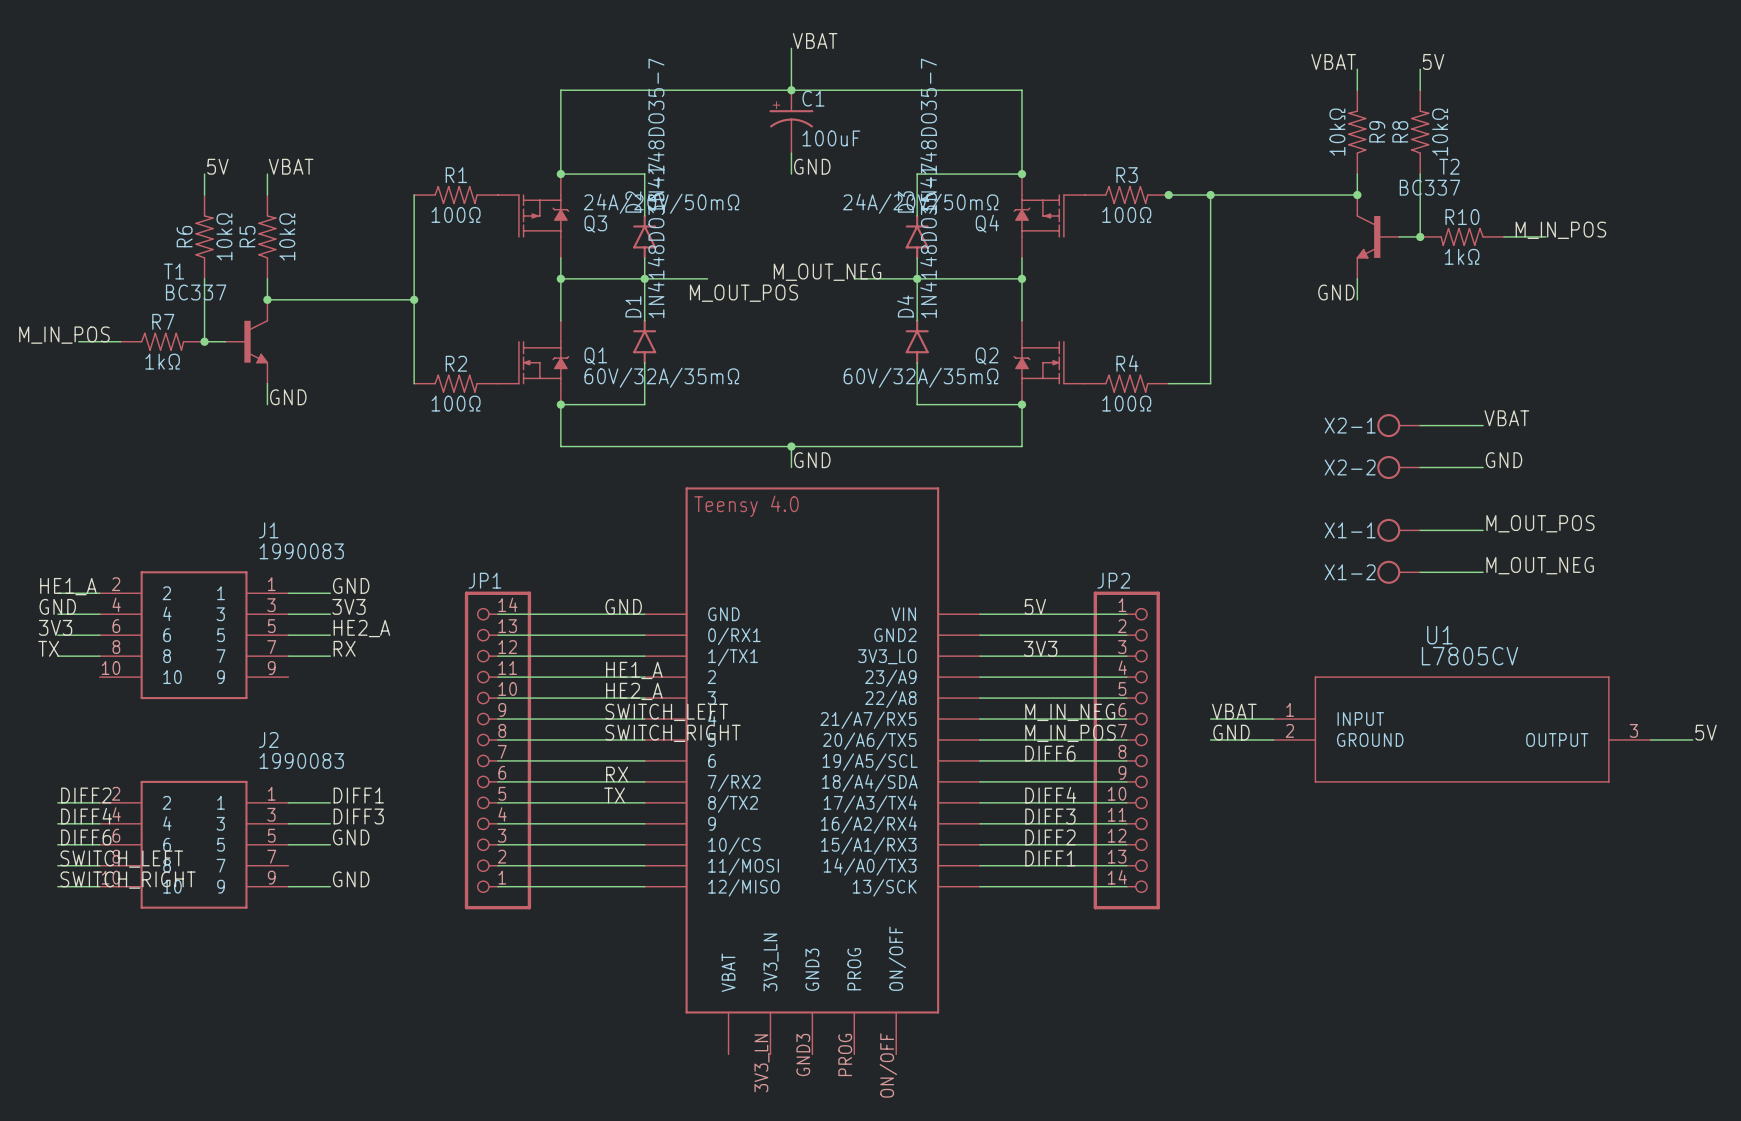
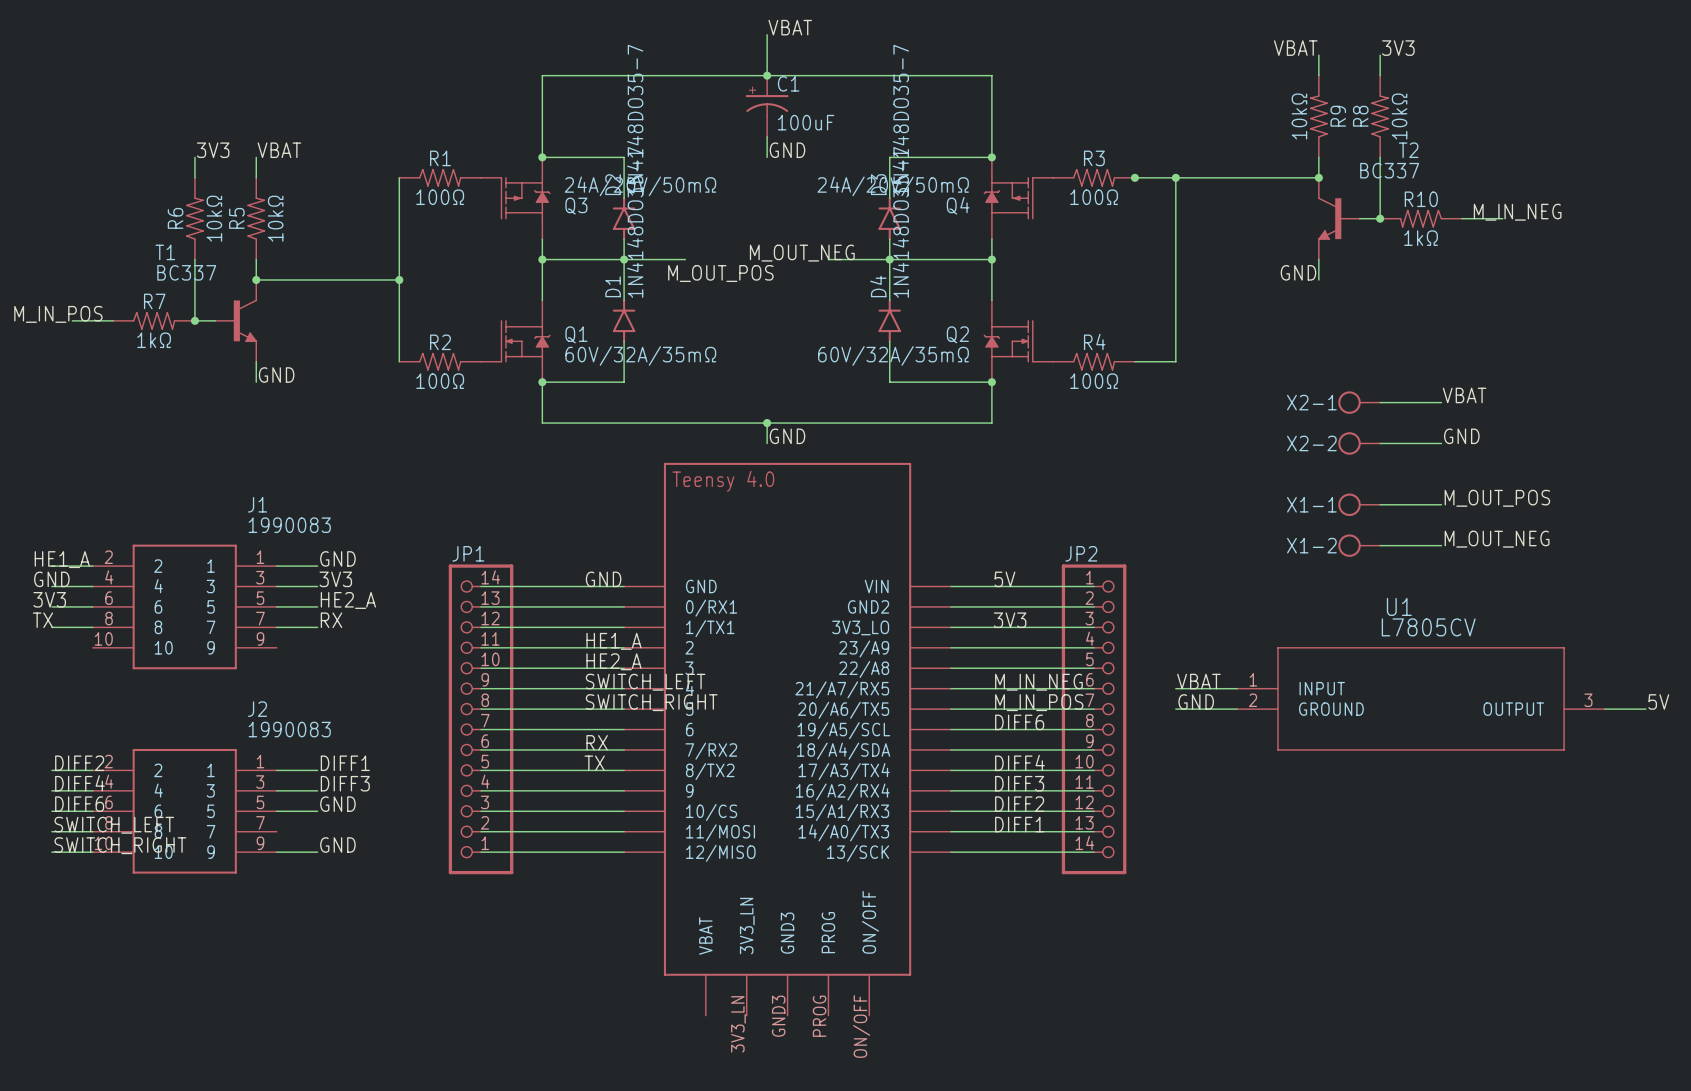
label: 5V (1433, 61) -> 3V3 (1398, 48)
label: 5V (217, 166) -> 3V3 (213, 150)
label: M_IN_POS (1560, 230) -> M_IN_NEG (1517, 212)

